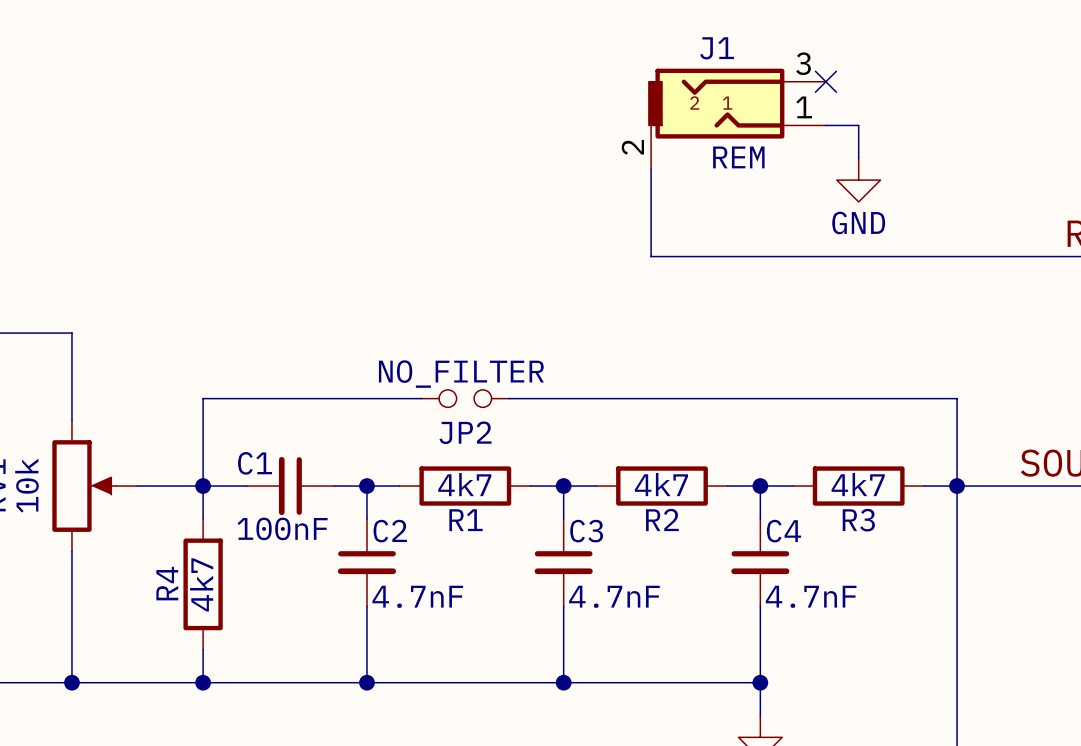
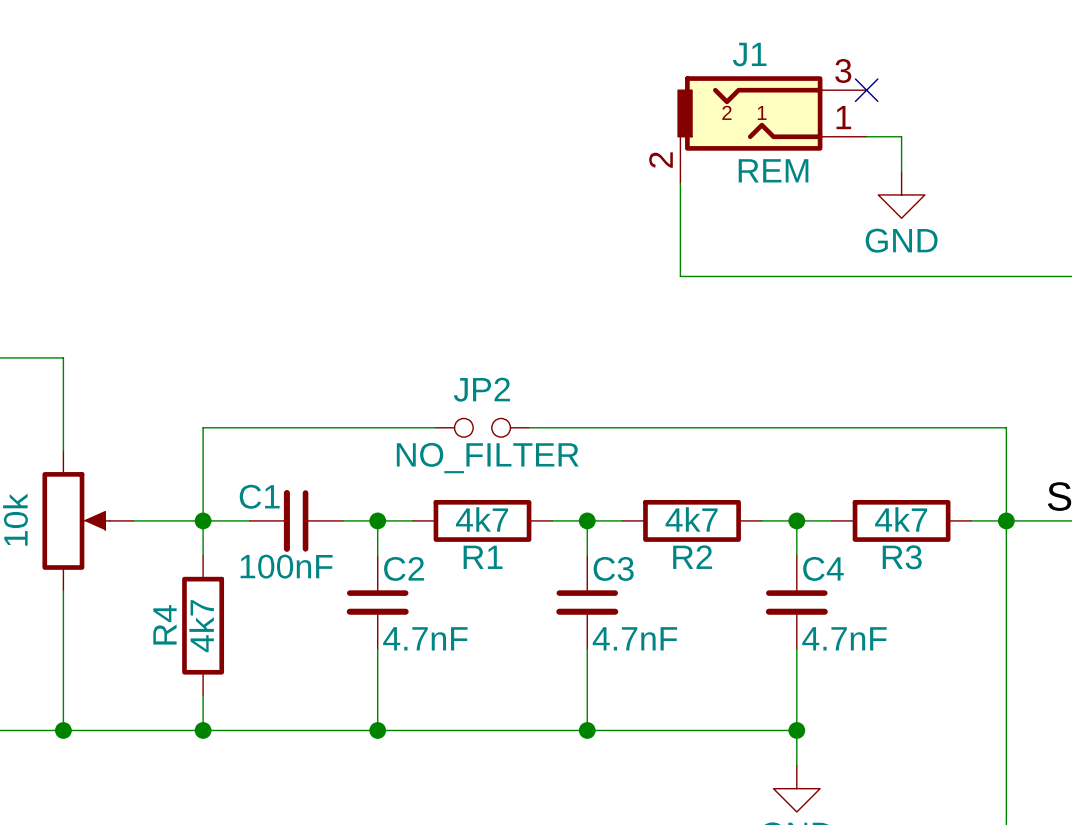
JP2 value position: NO_FILTER (461, 374) -> NO_FILTER (487, 458)
JP2 name position: JP2 (465, 432) -> JP2 (481, 389)

